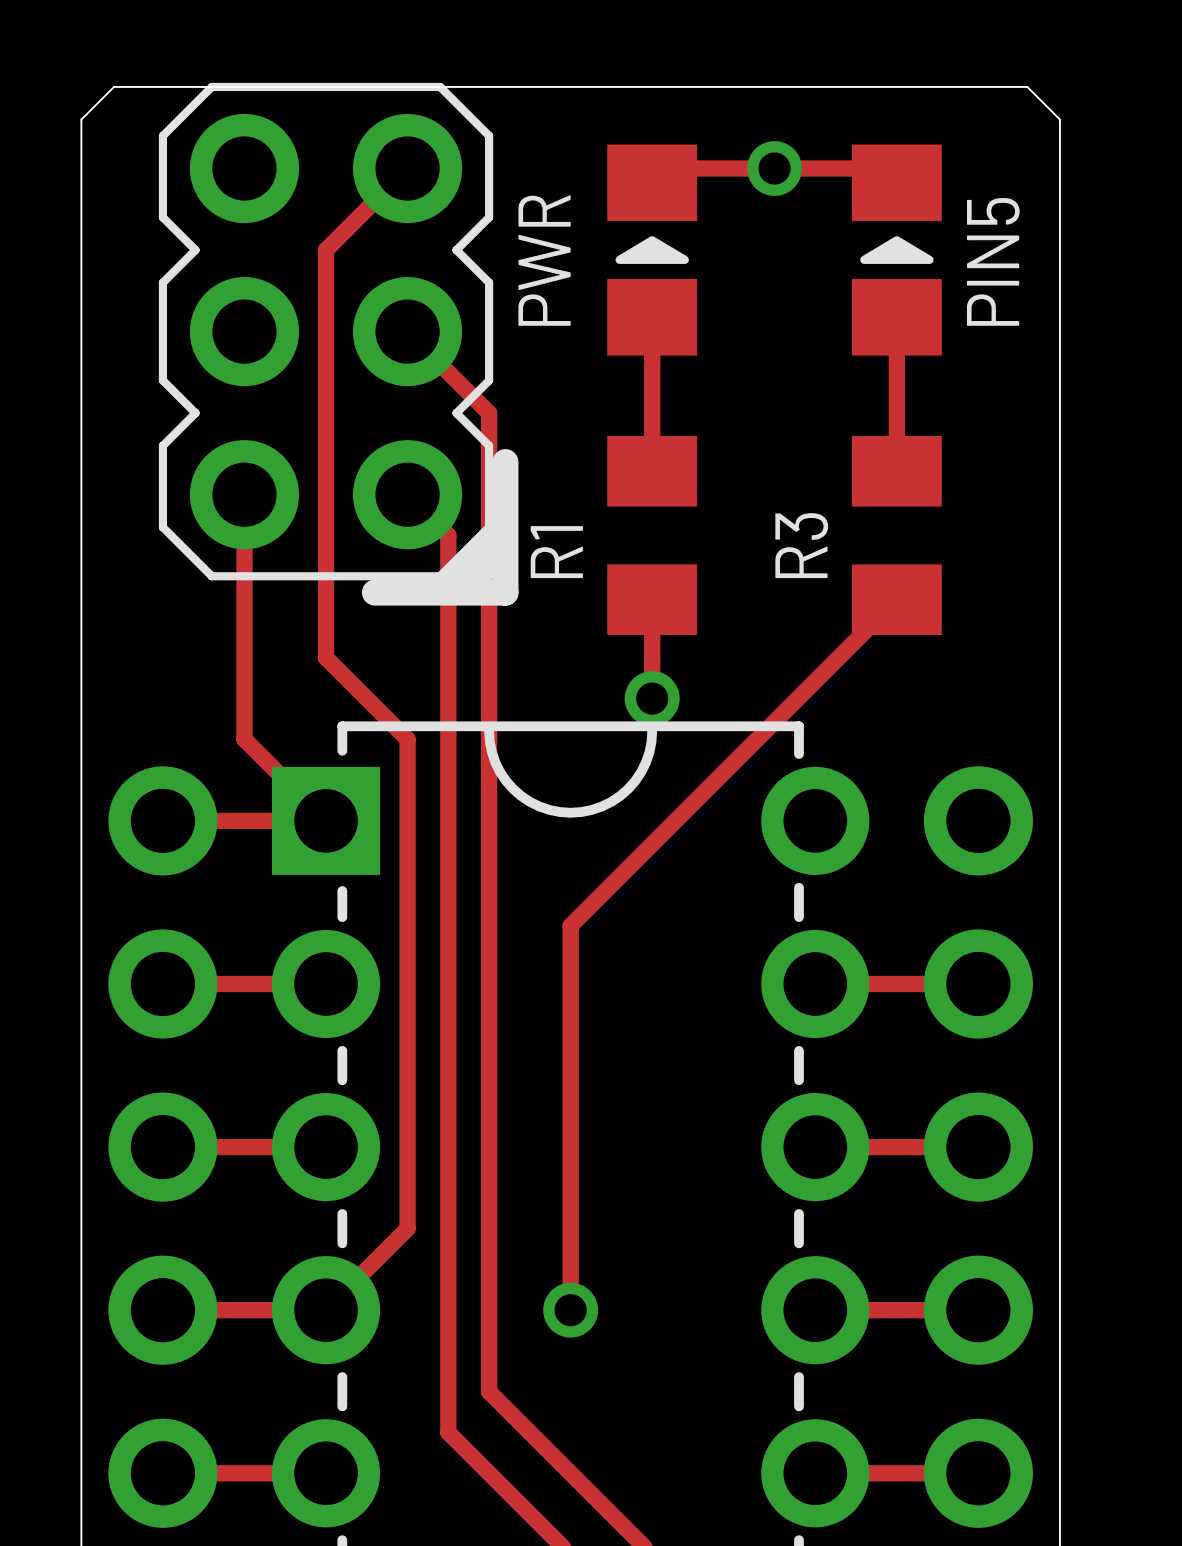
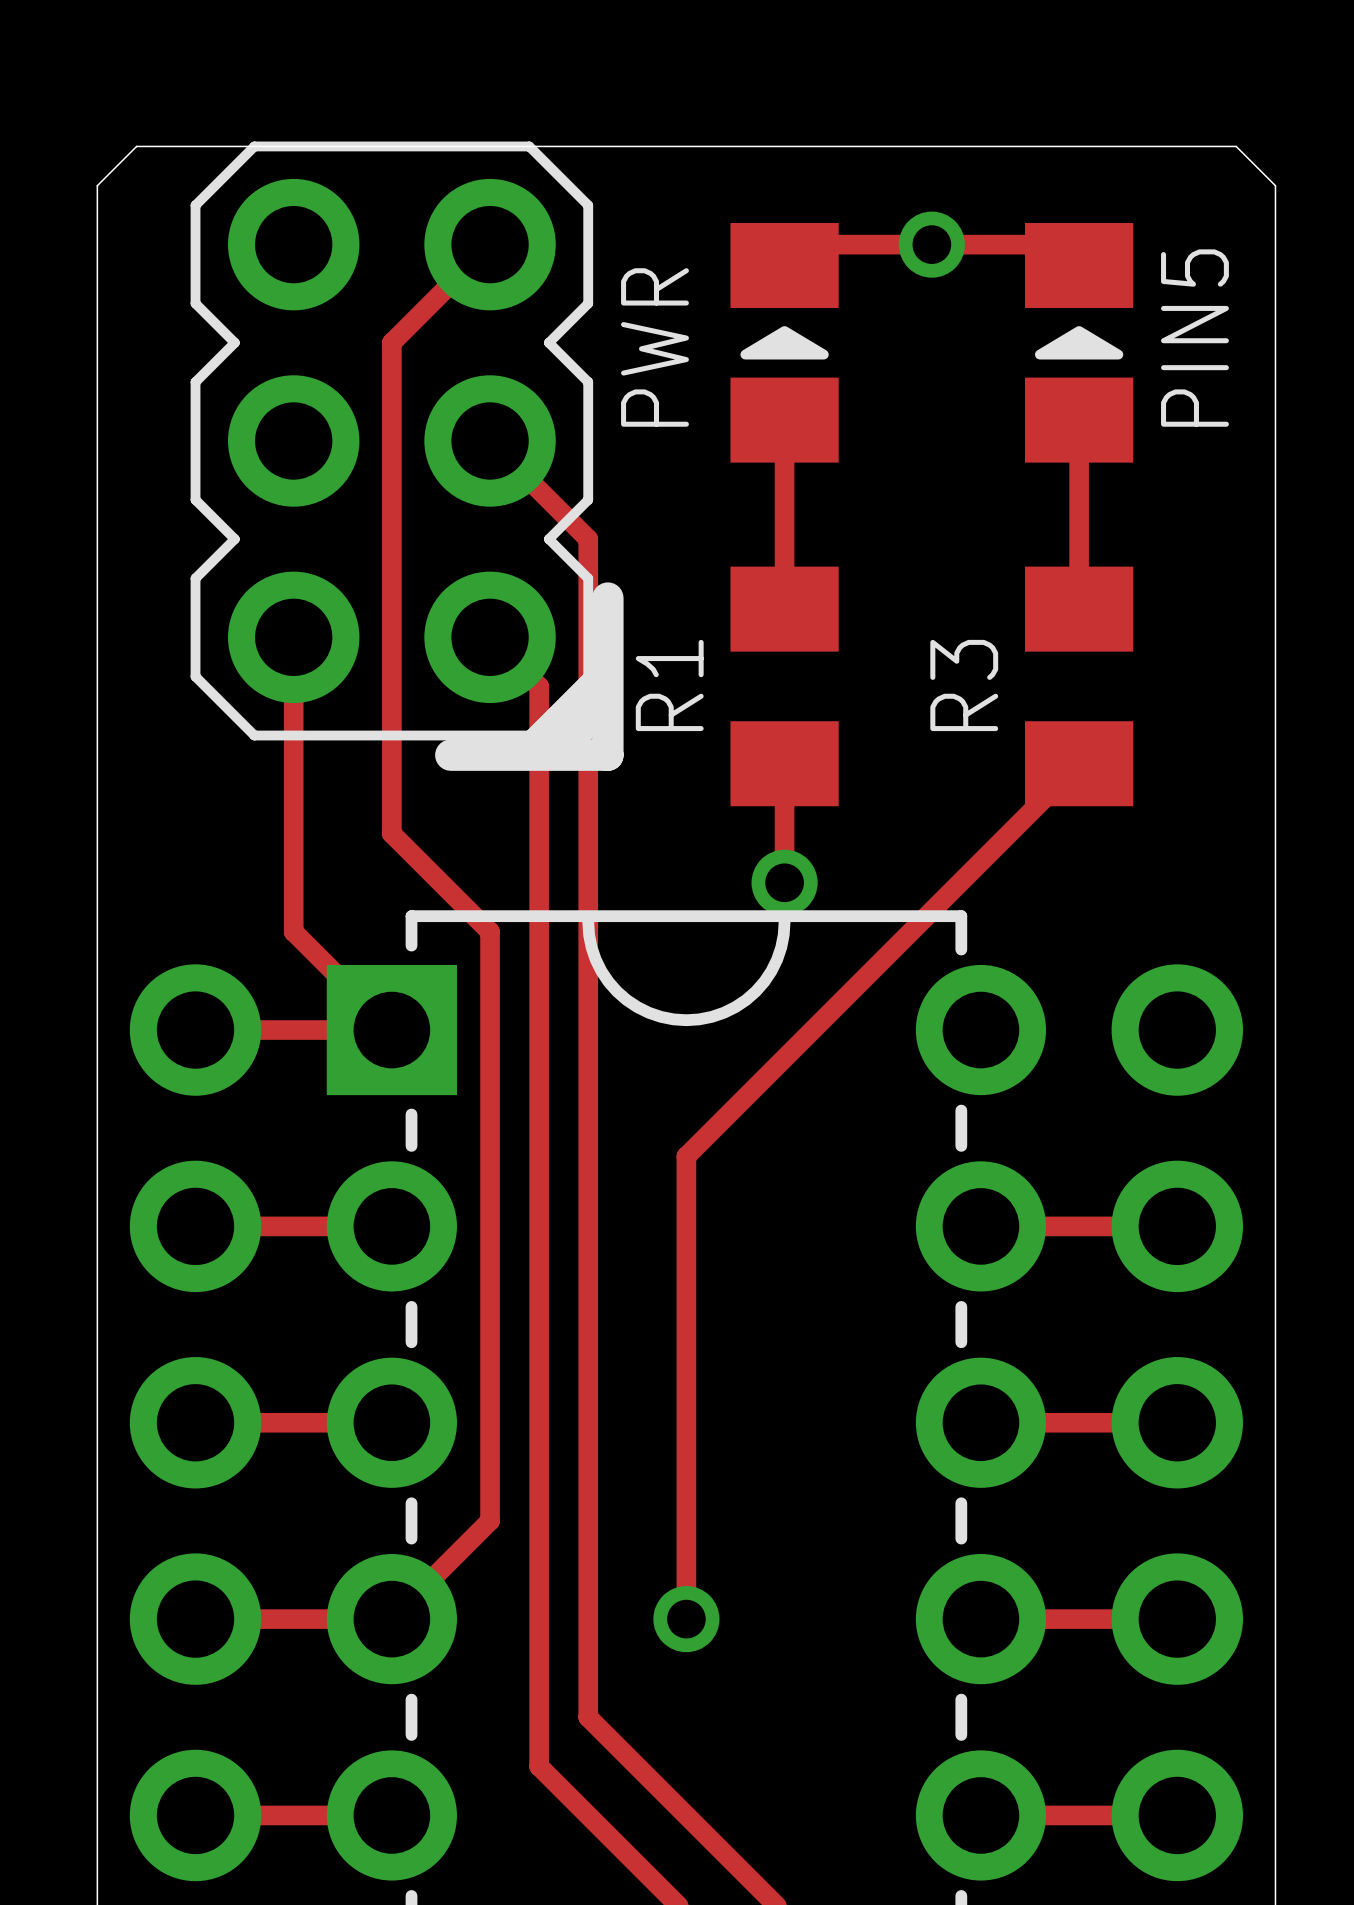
part footprint: [607, 144, 698, 356] -> [730, 222, 839, 463]
part footprint: [851, 144, 942, 356] -> [1025, 222, 1134, 463]

